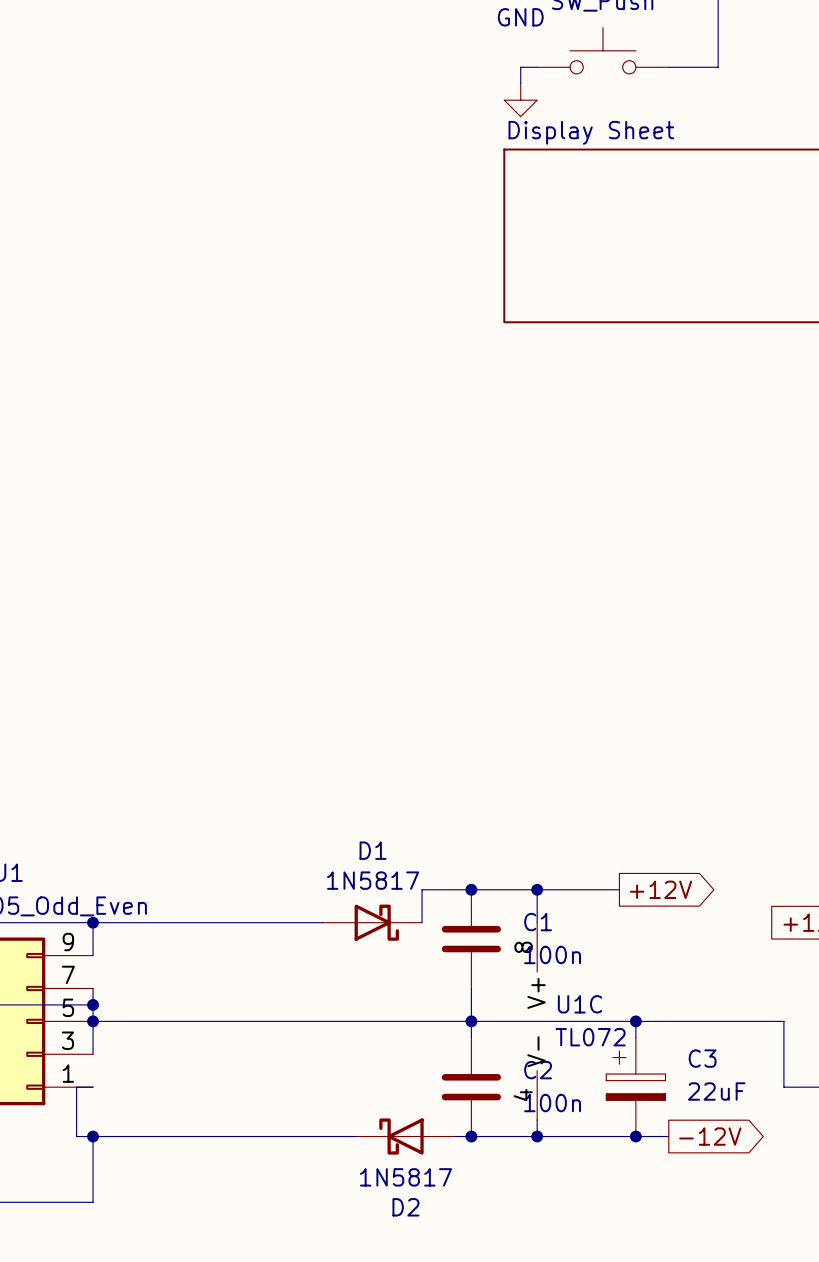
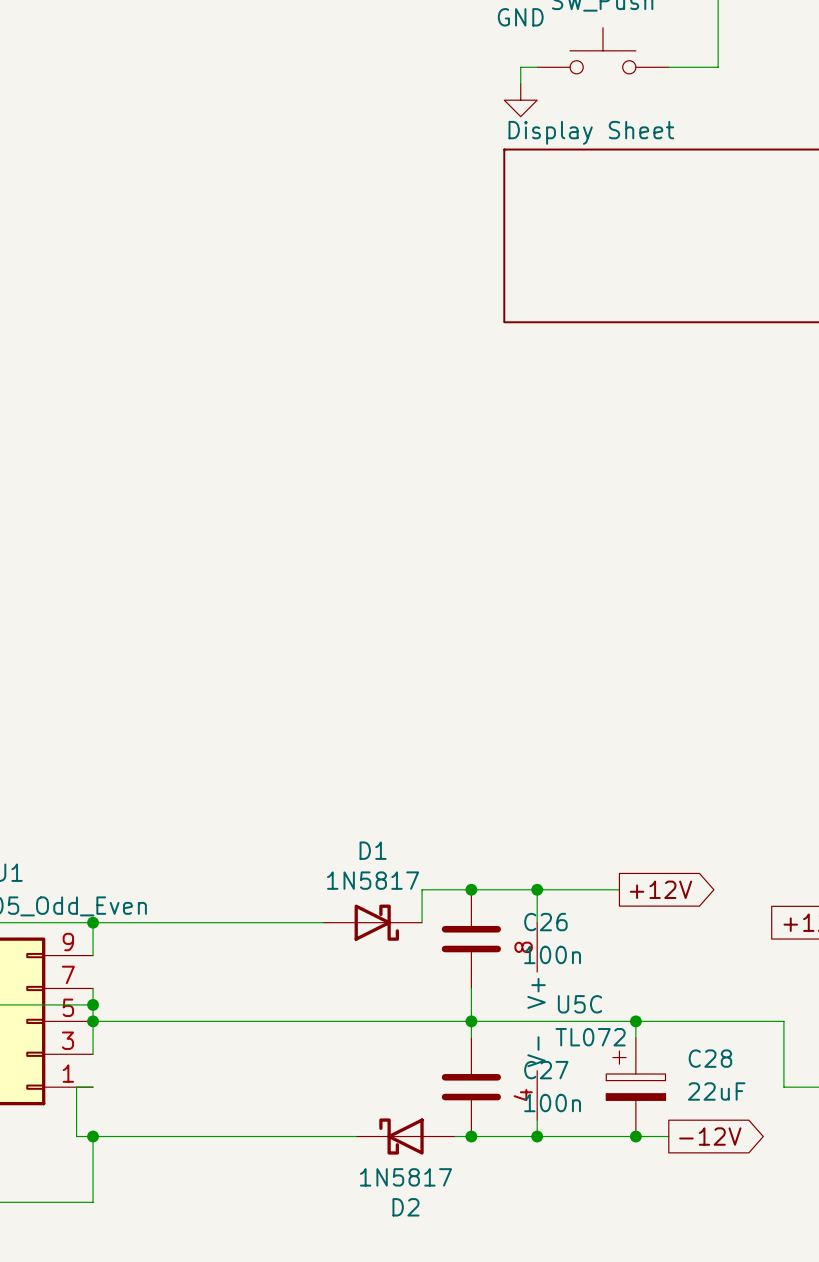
C1 name: C1 (538, 922) -> C26 (545, 922)
U1C name: U1C (579, 1004) -> U5C (579, 1004)
C3 name: C3 (702, 1058) -> C28 (710, 1058)
C2 name: C2 (538, 1070) -> C27 (546, 1070)

